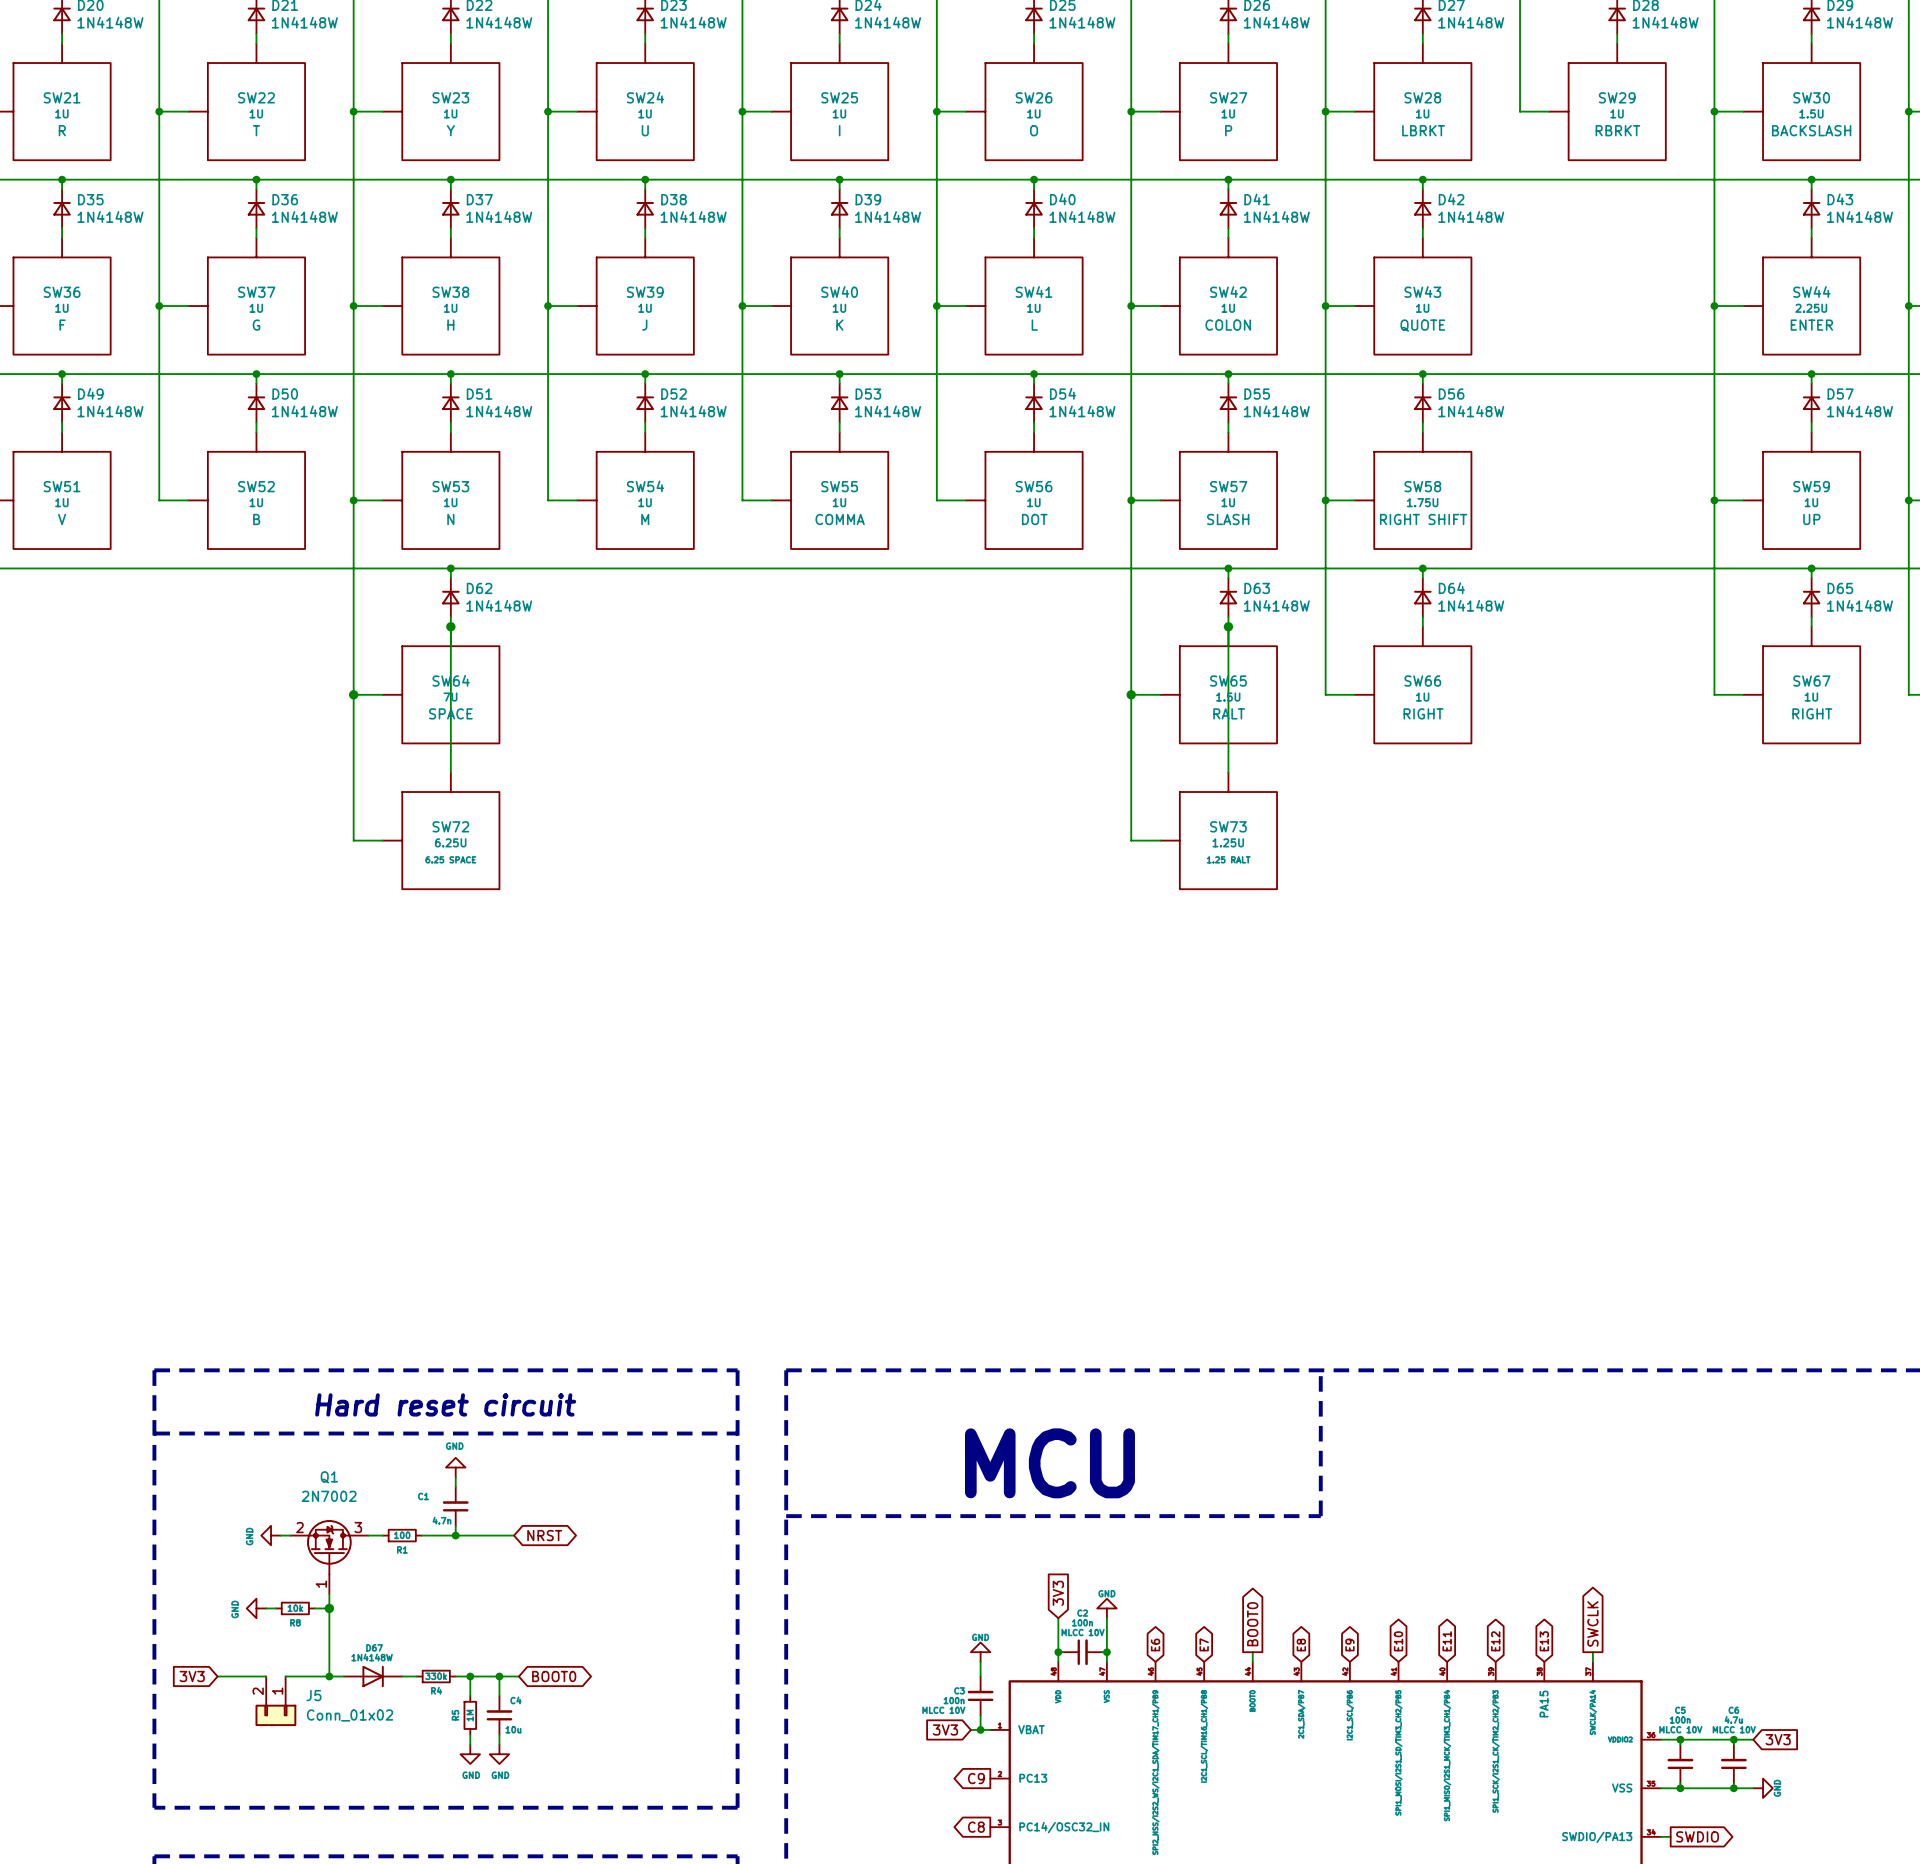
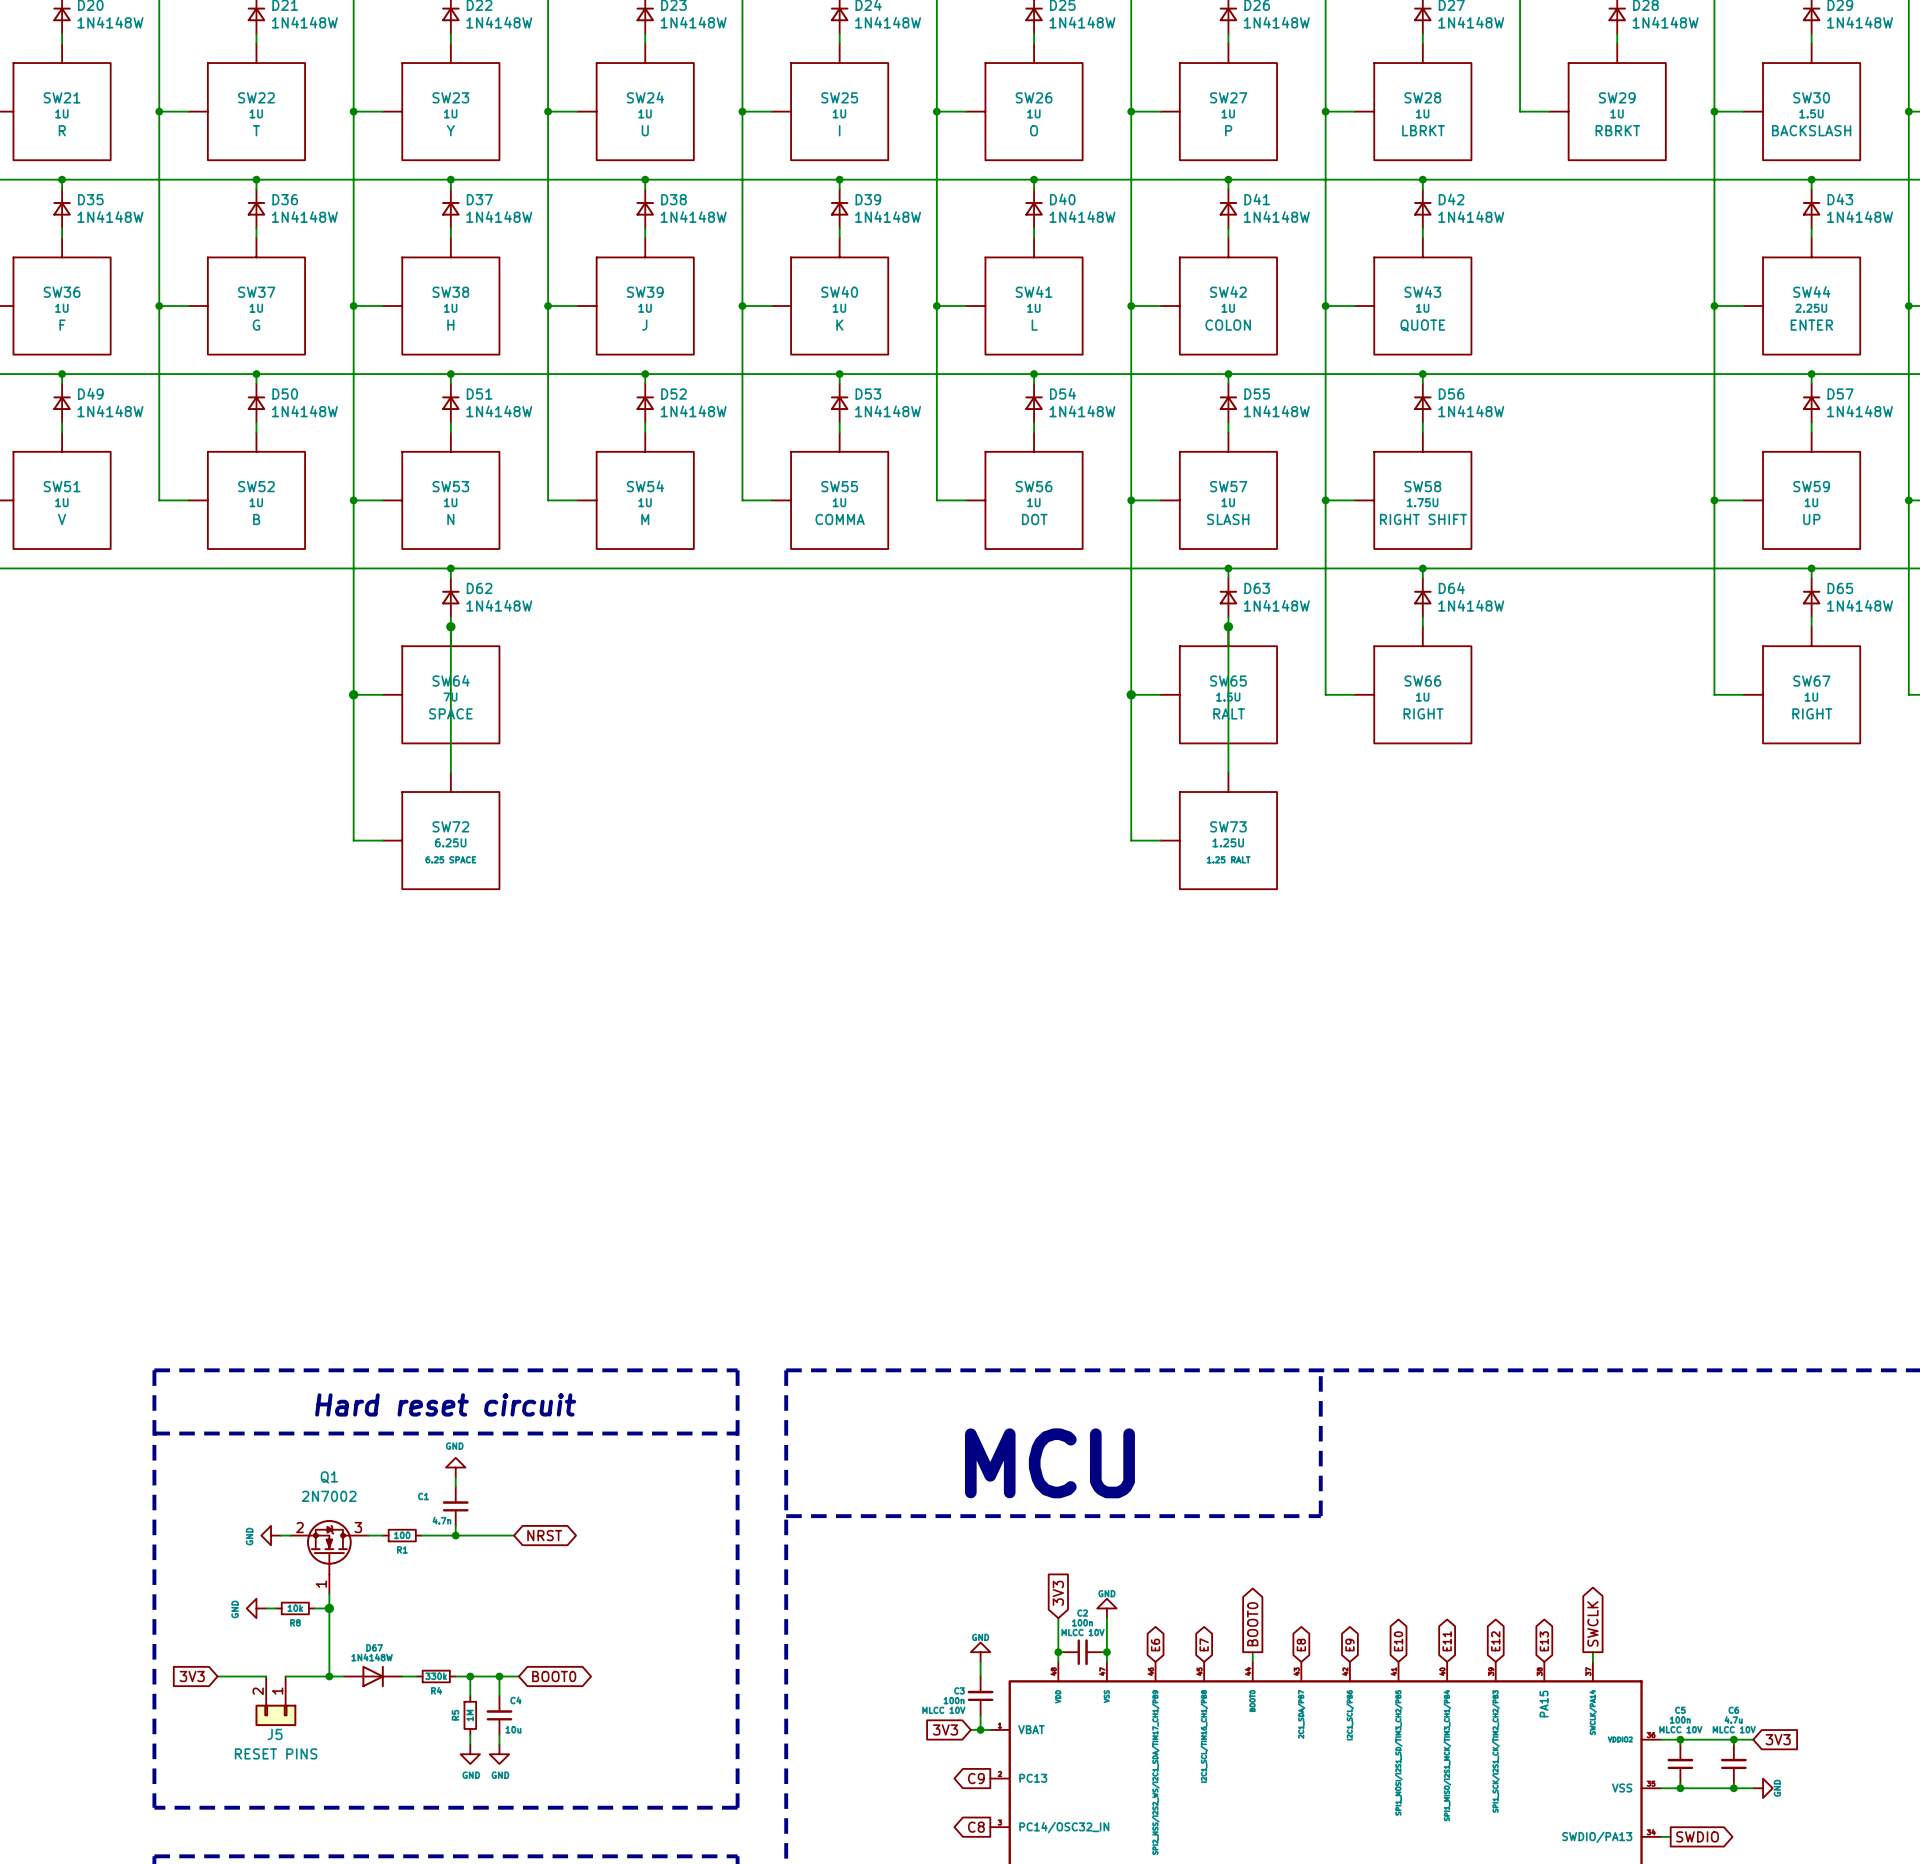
J5 name position: J5 (313, 1695) -> J5 (275, 1734)
J5 value: Conn_01x02 (350, 1715) -> RESET PINS (276, 1753)

